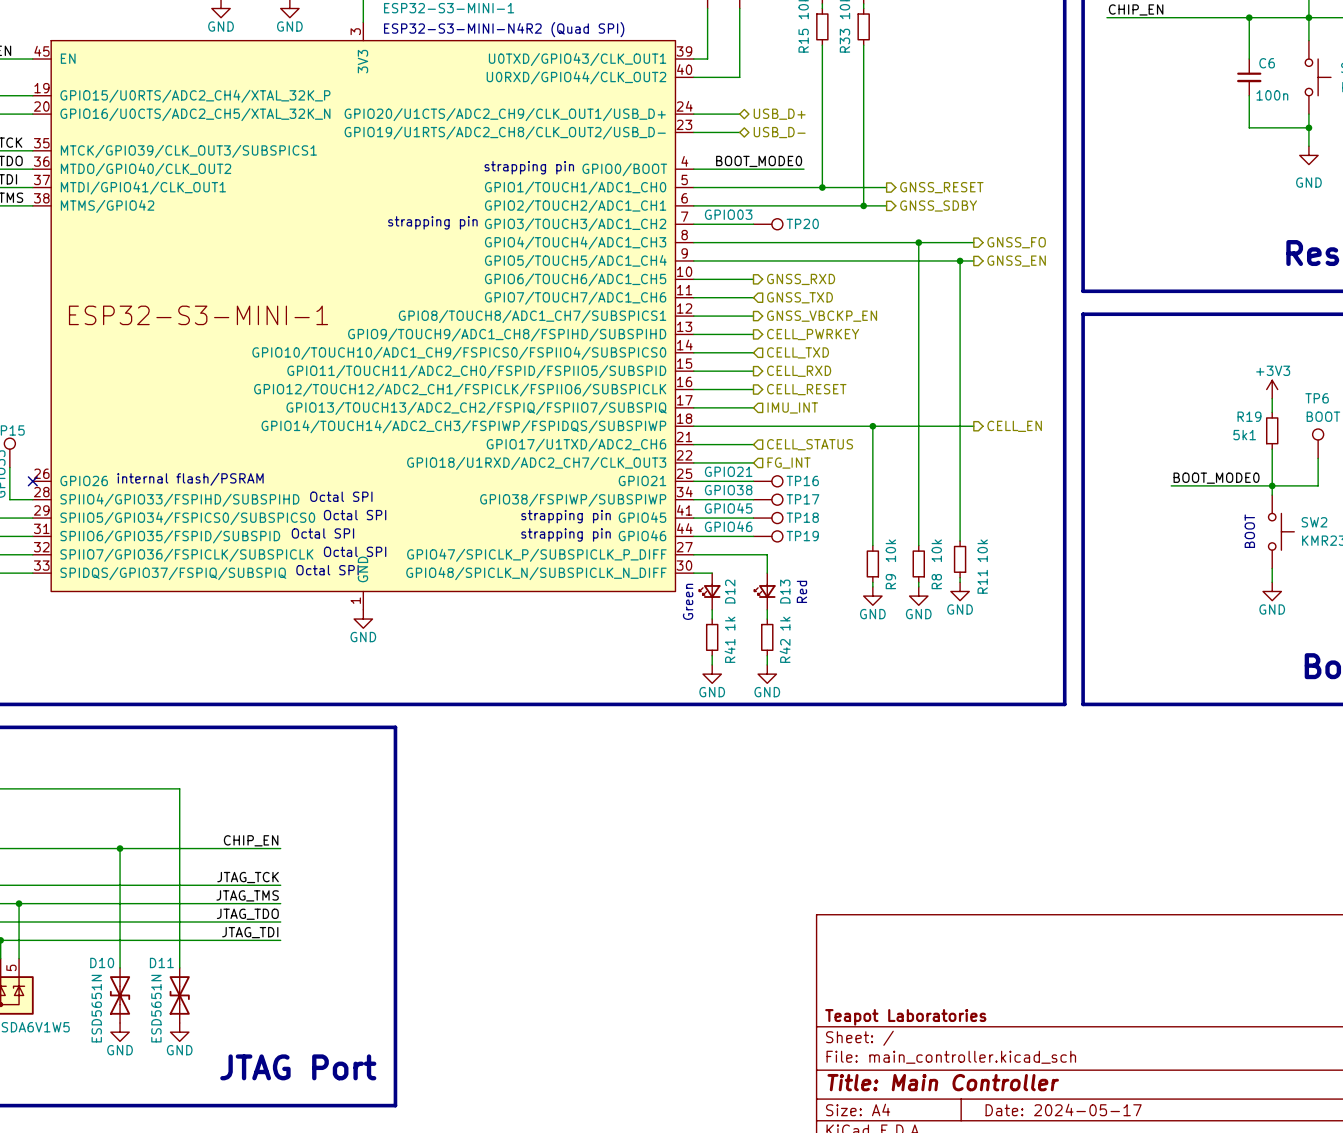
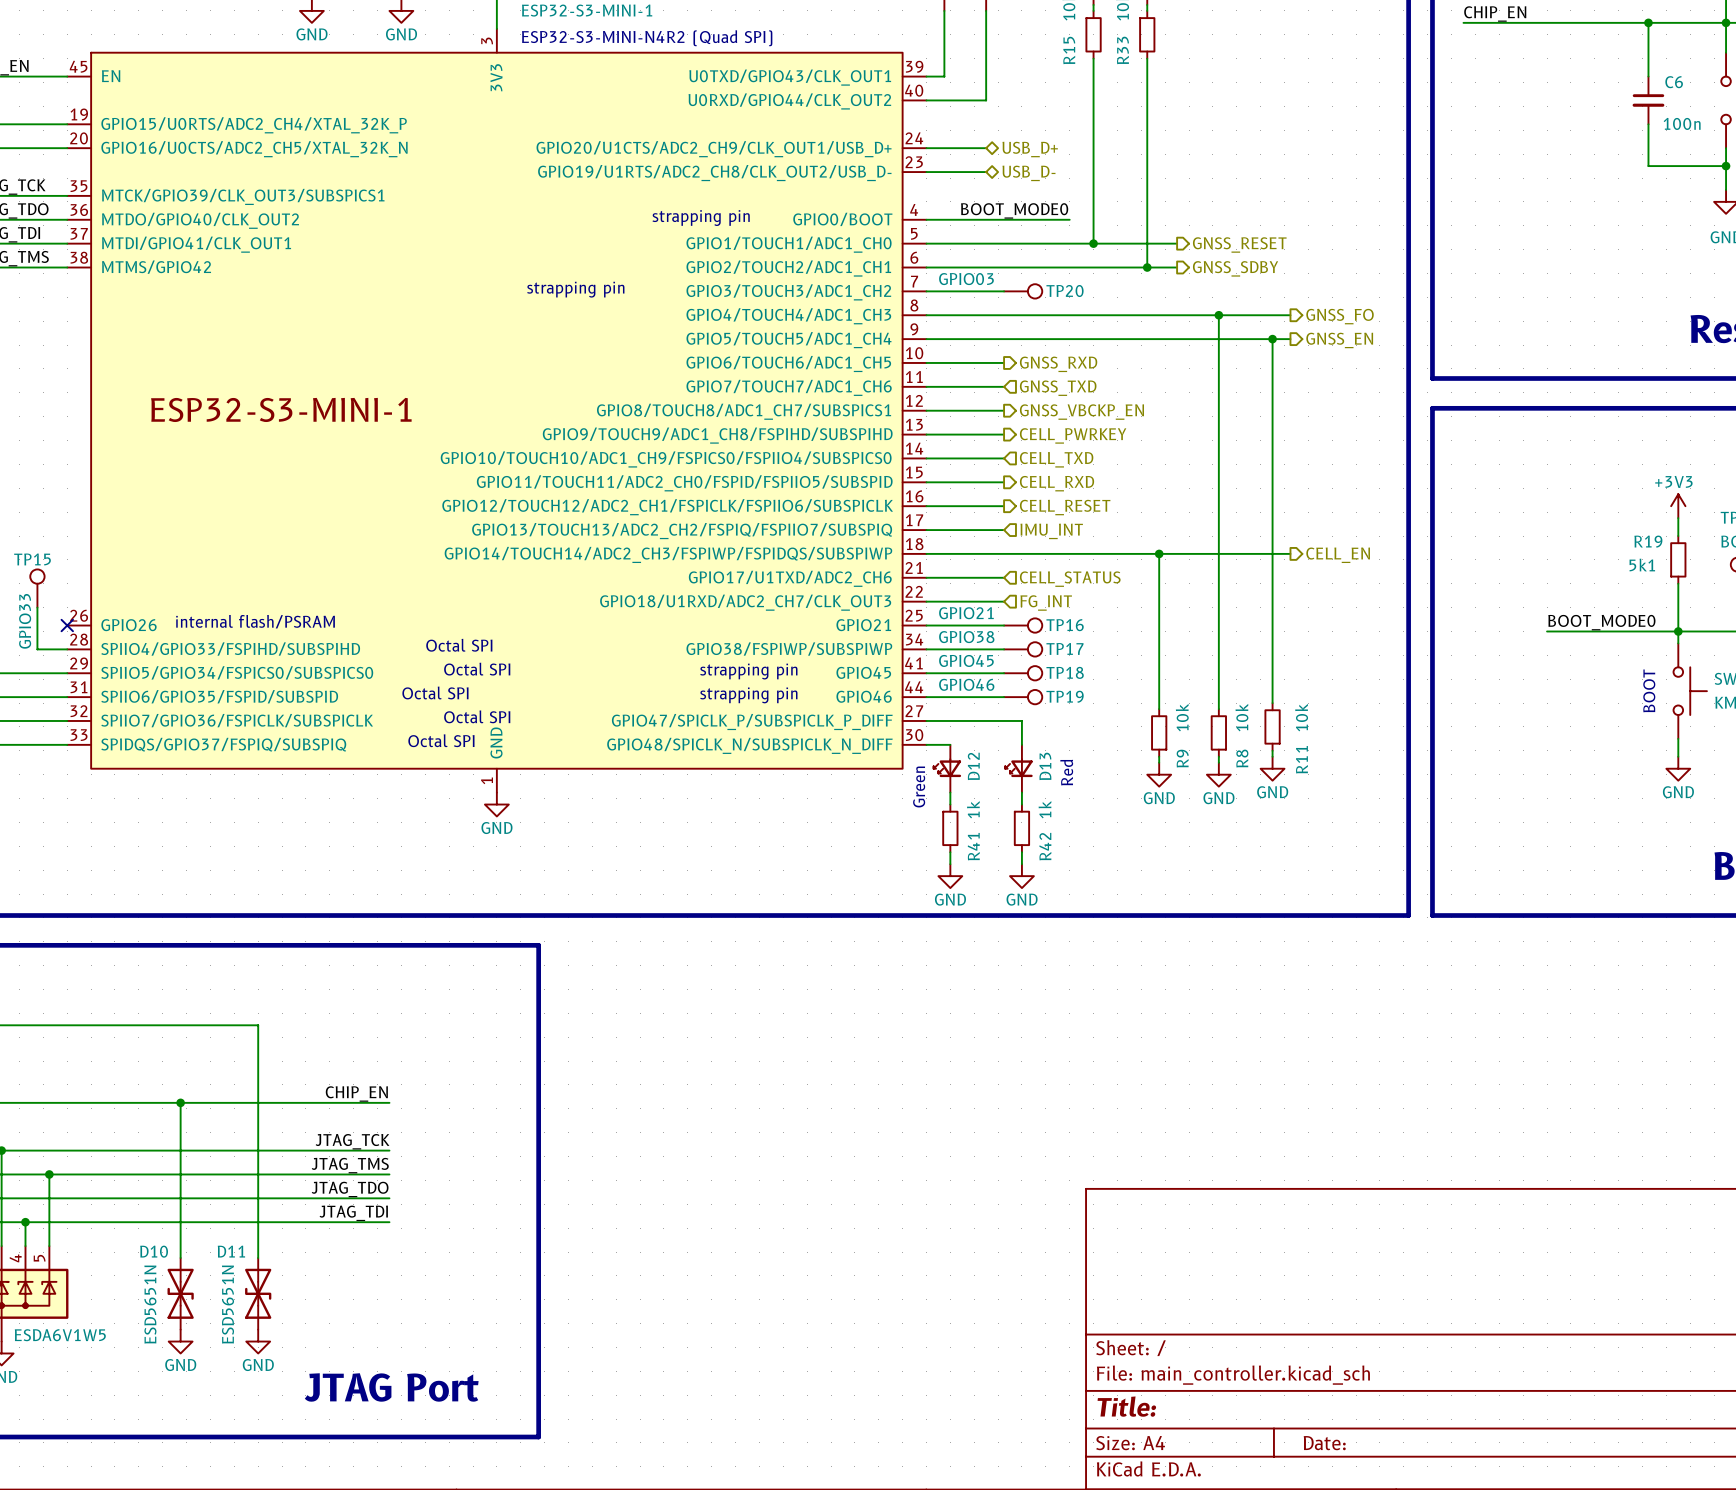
title block: Teapot Laboratories (905, 1017) -> none
title block: Title: Main Controller (943, 1082) -> Title: (1126, 1406)
title block: Date: 2024-05-17 (1063, 1109) -> Date: (1324, 1443)

